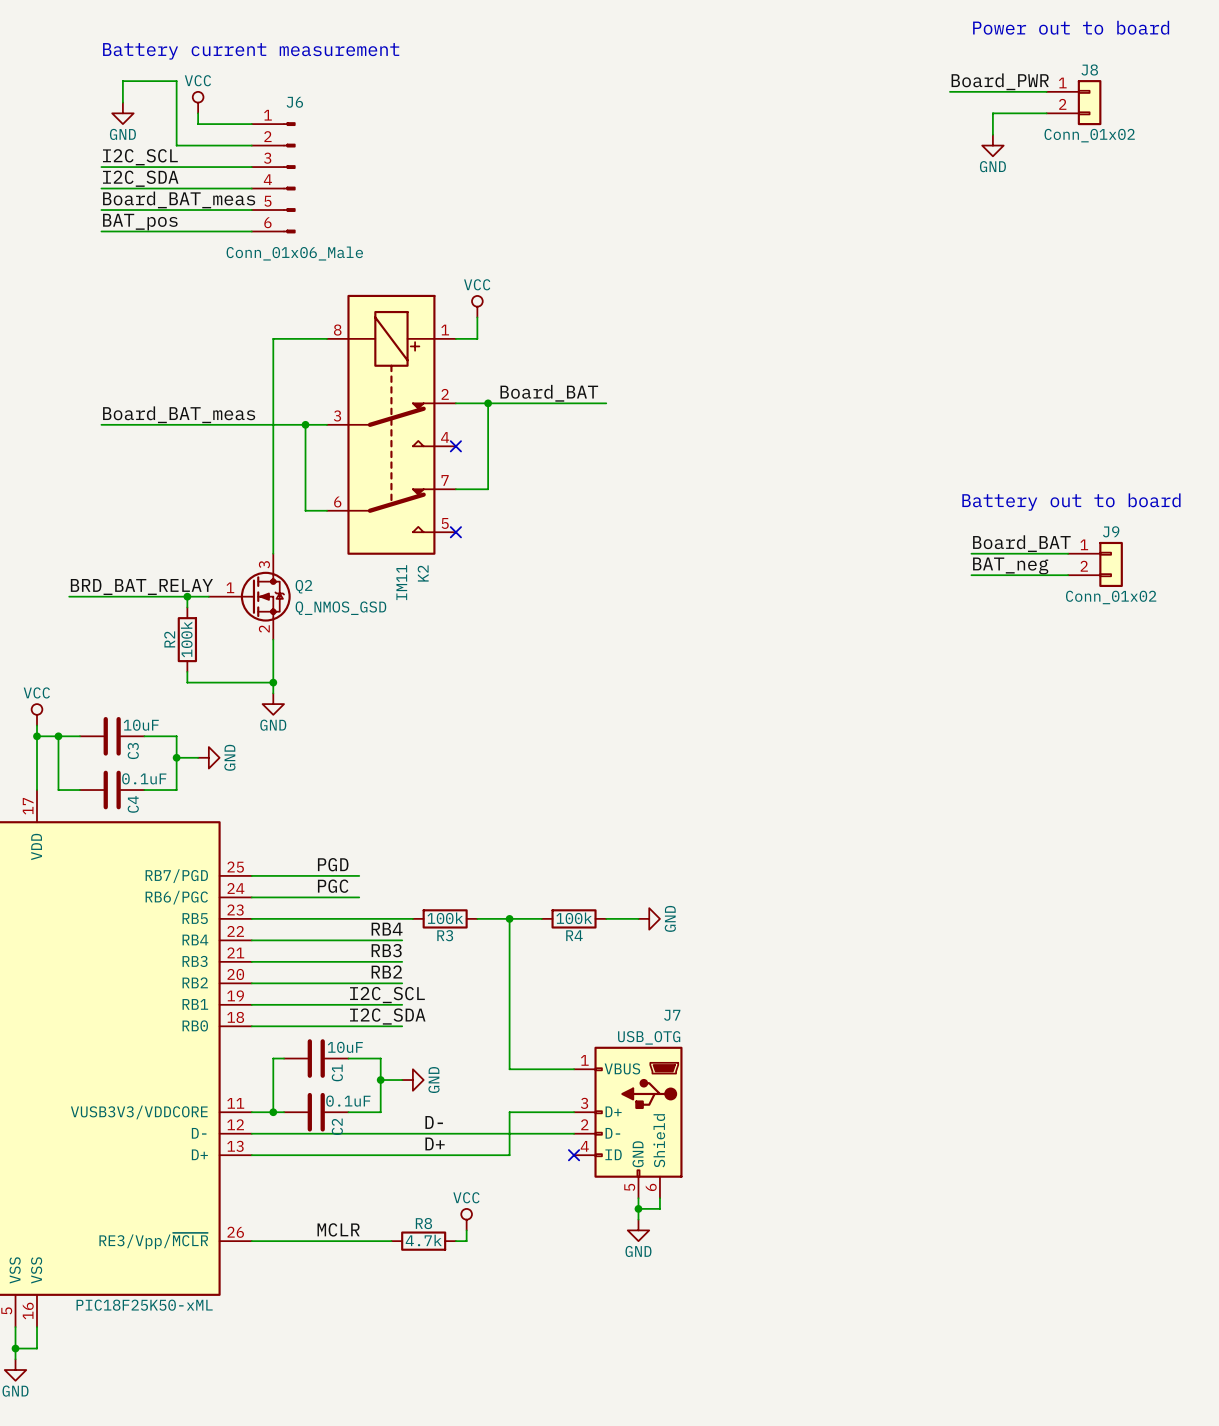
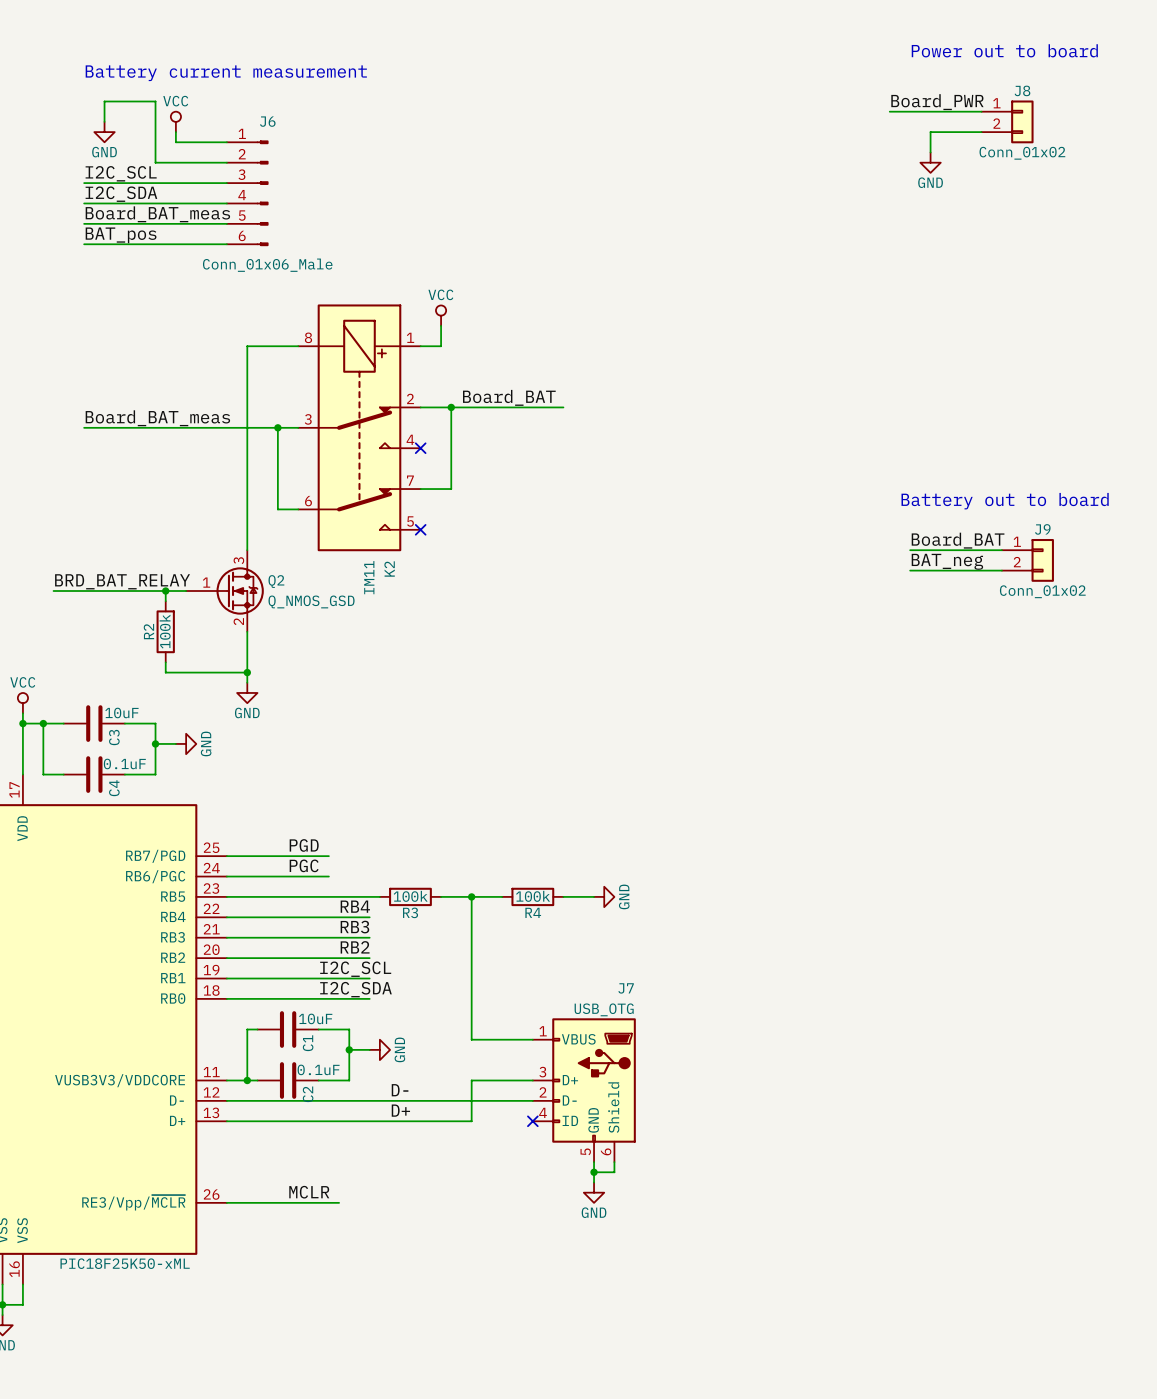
power symbol: VCC (466, 1219) -> none
wire: (466, 1230) (466, 1241) (455, 1241) -> none
wire: (369, 1241) (391, 1241) -> none
R8: 4.7k (423, 1241) -> none

